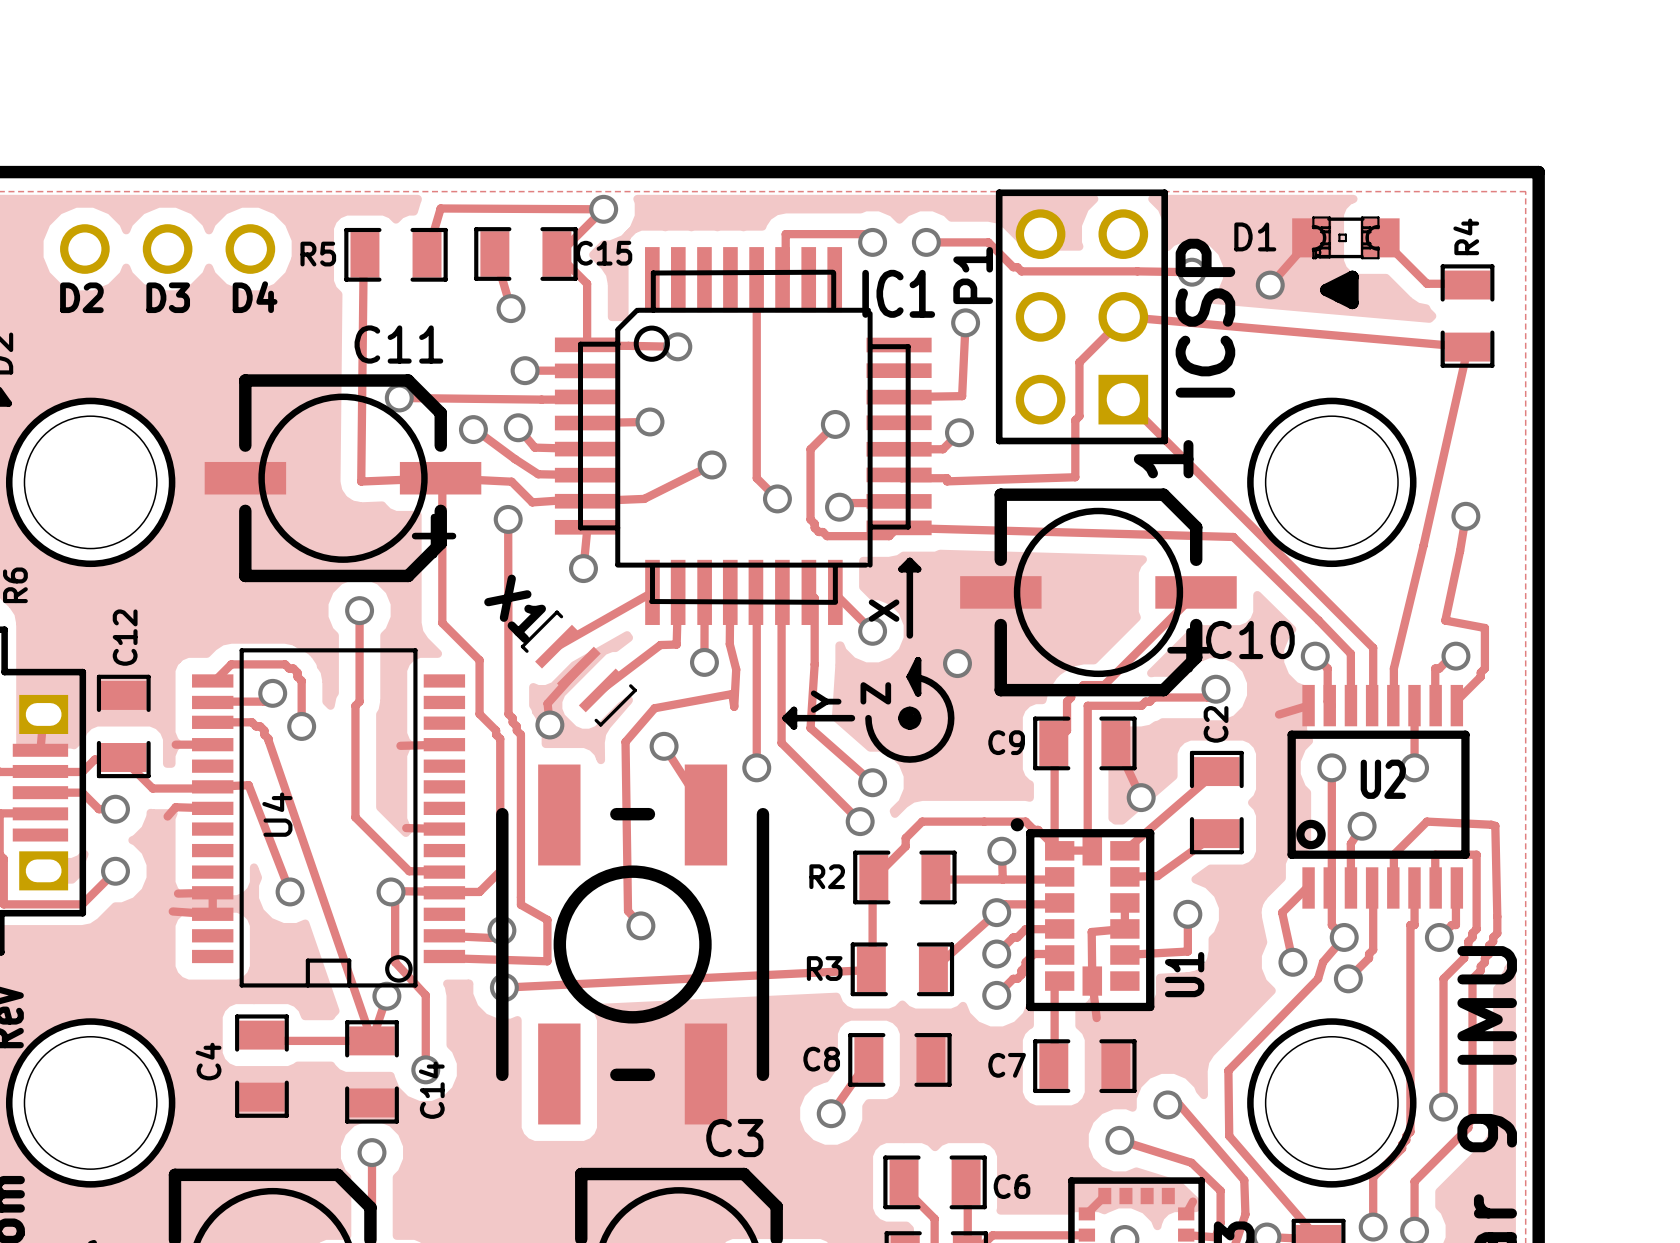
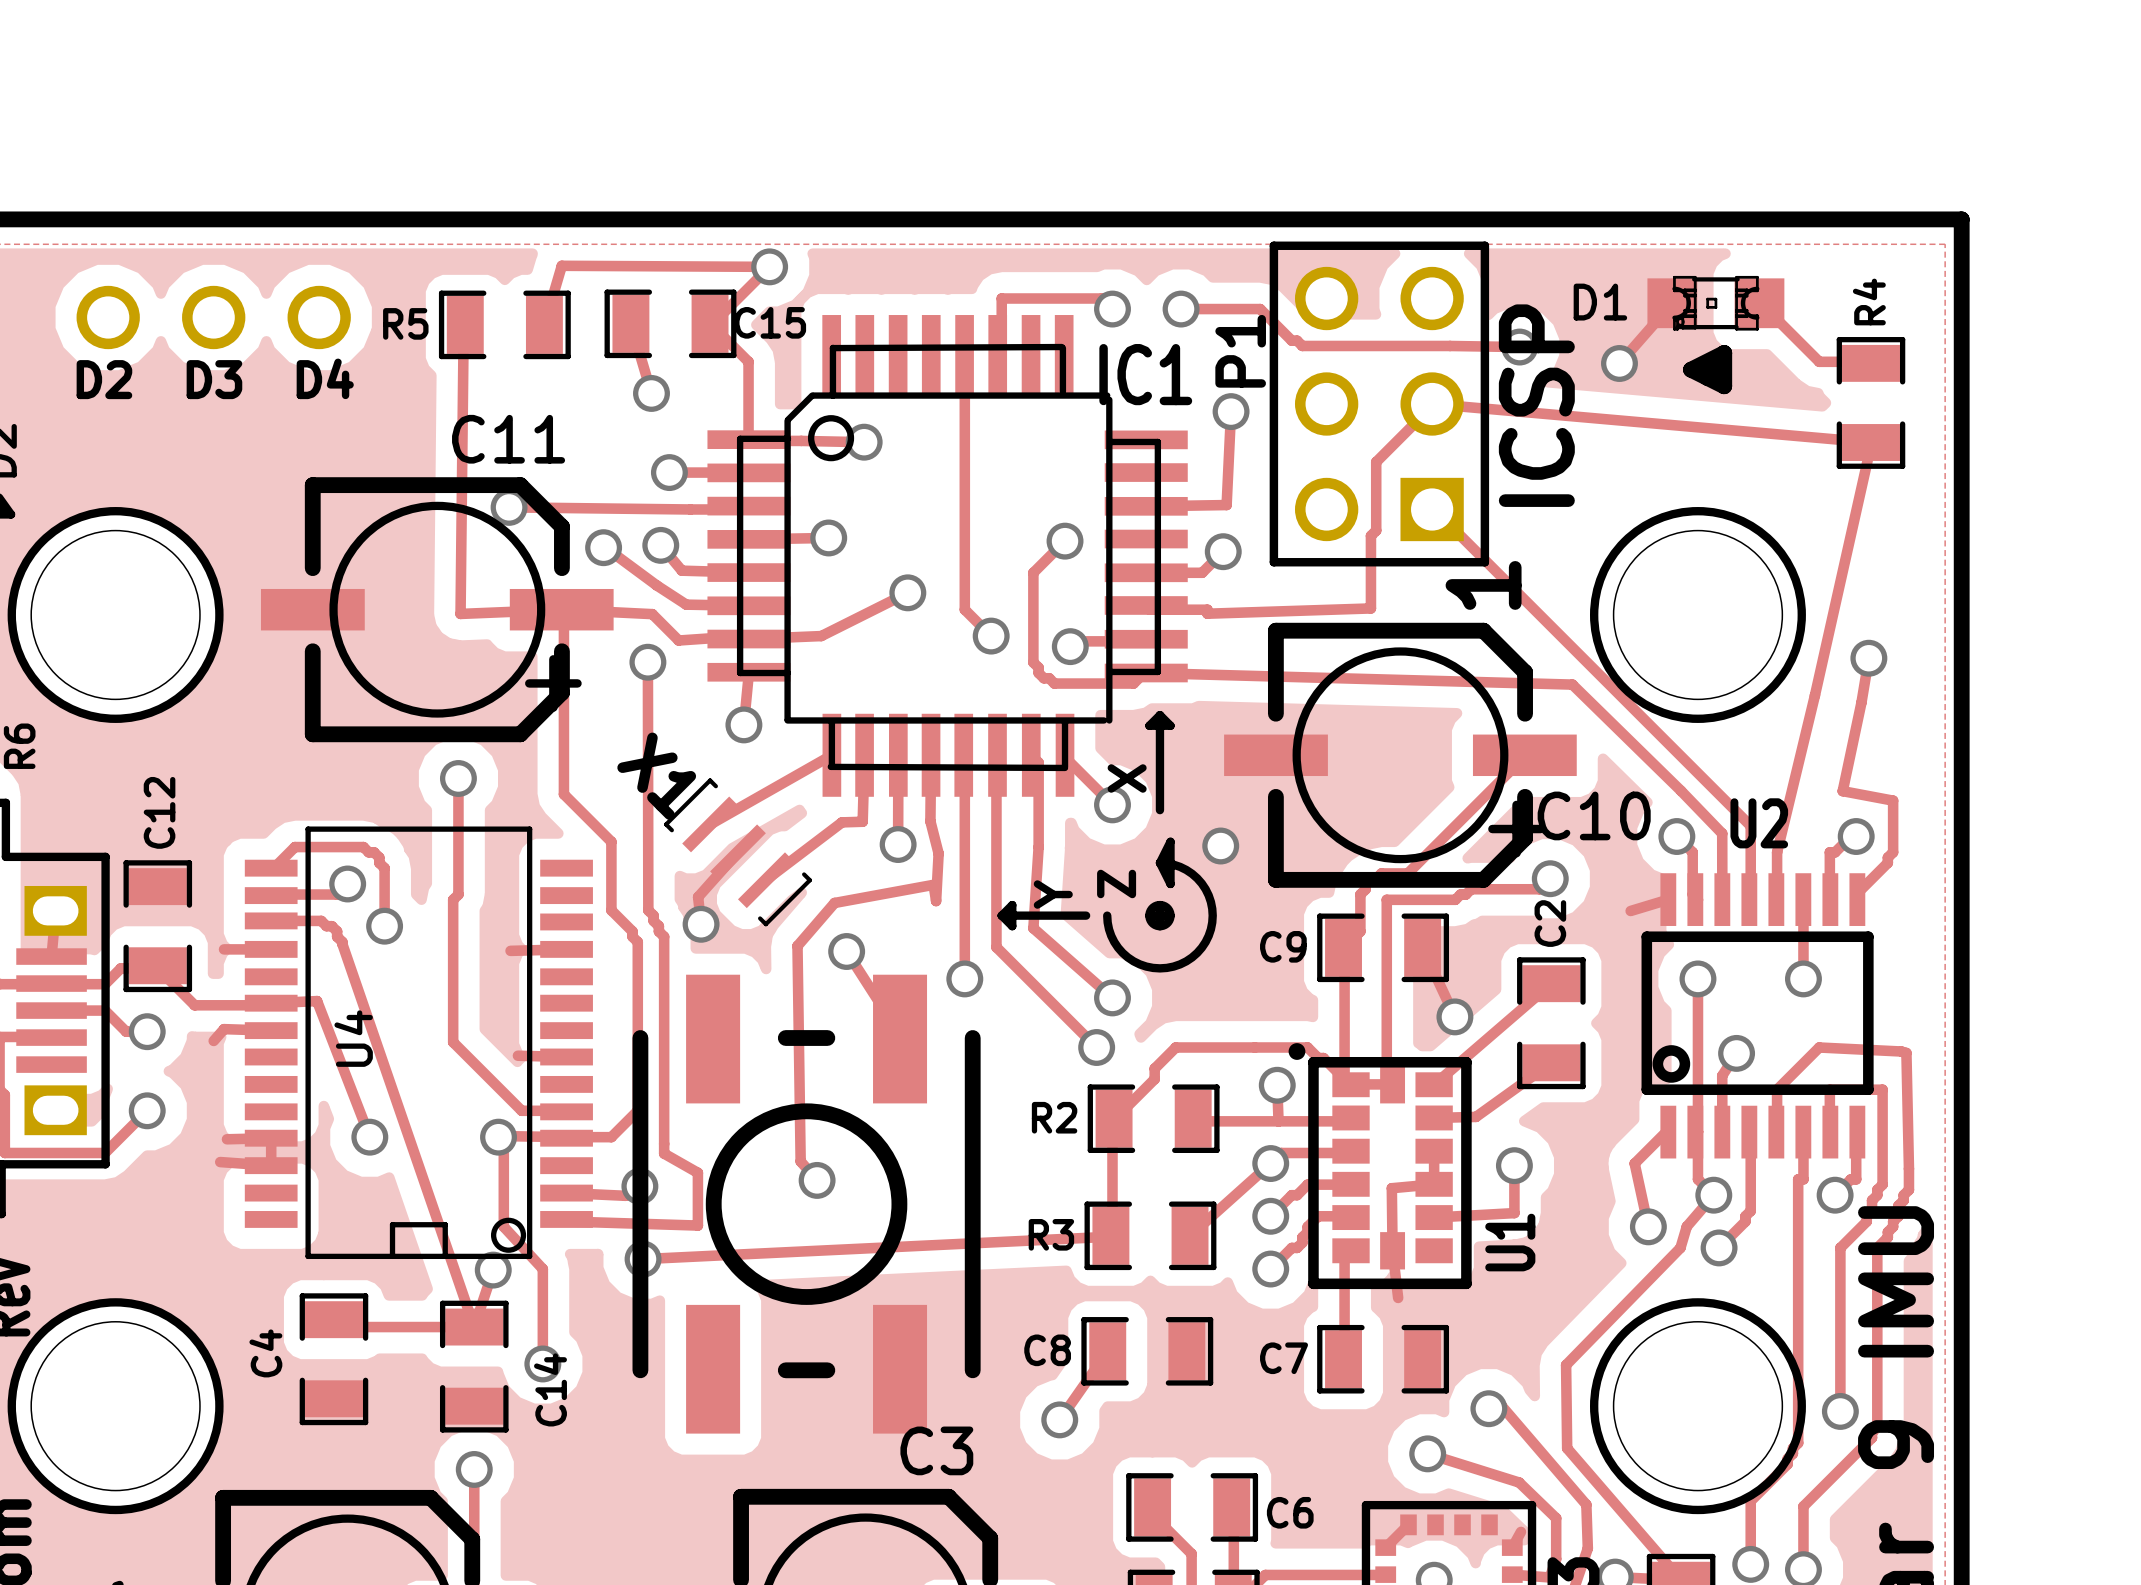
U2 name position: U2 (1383, 779) -> U2 (1759, 823)

